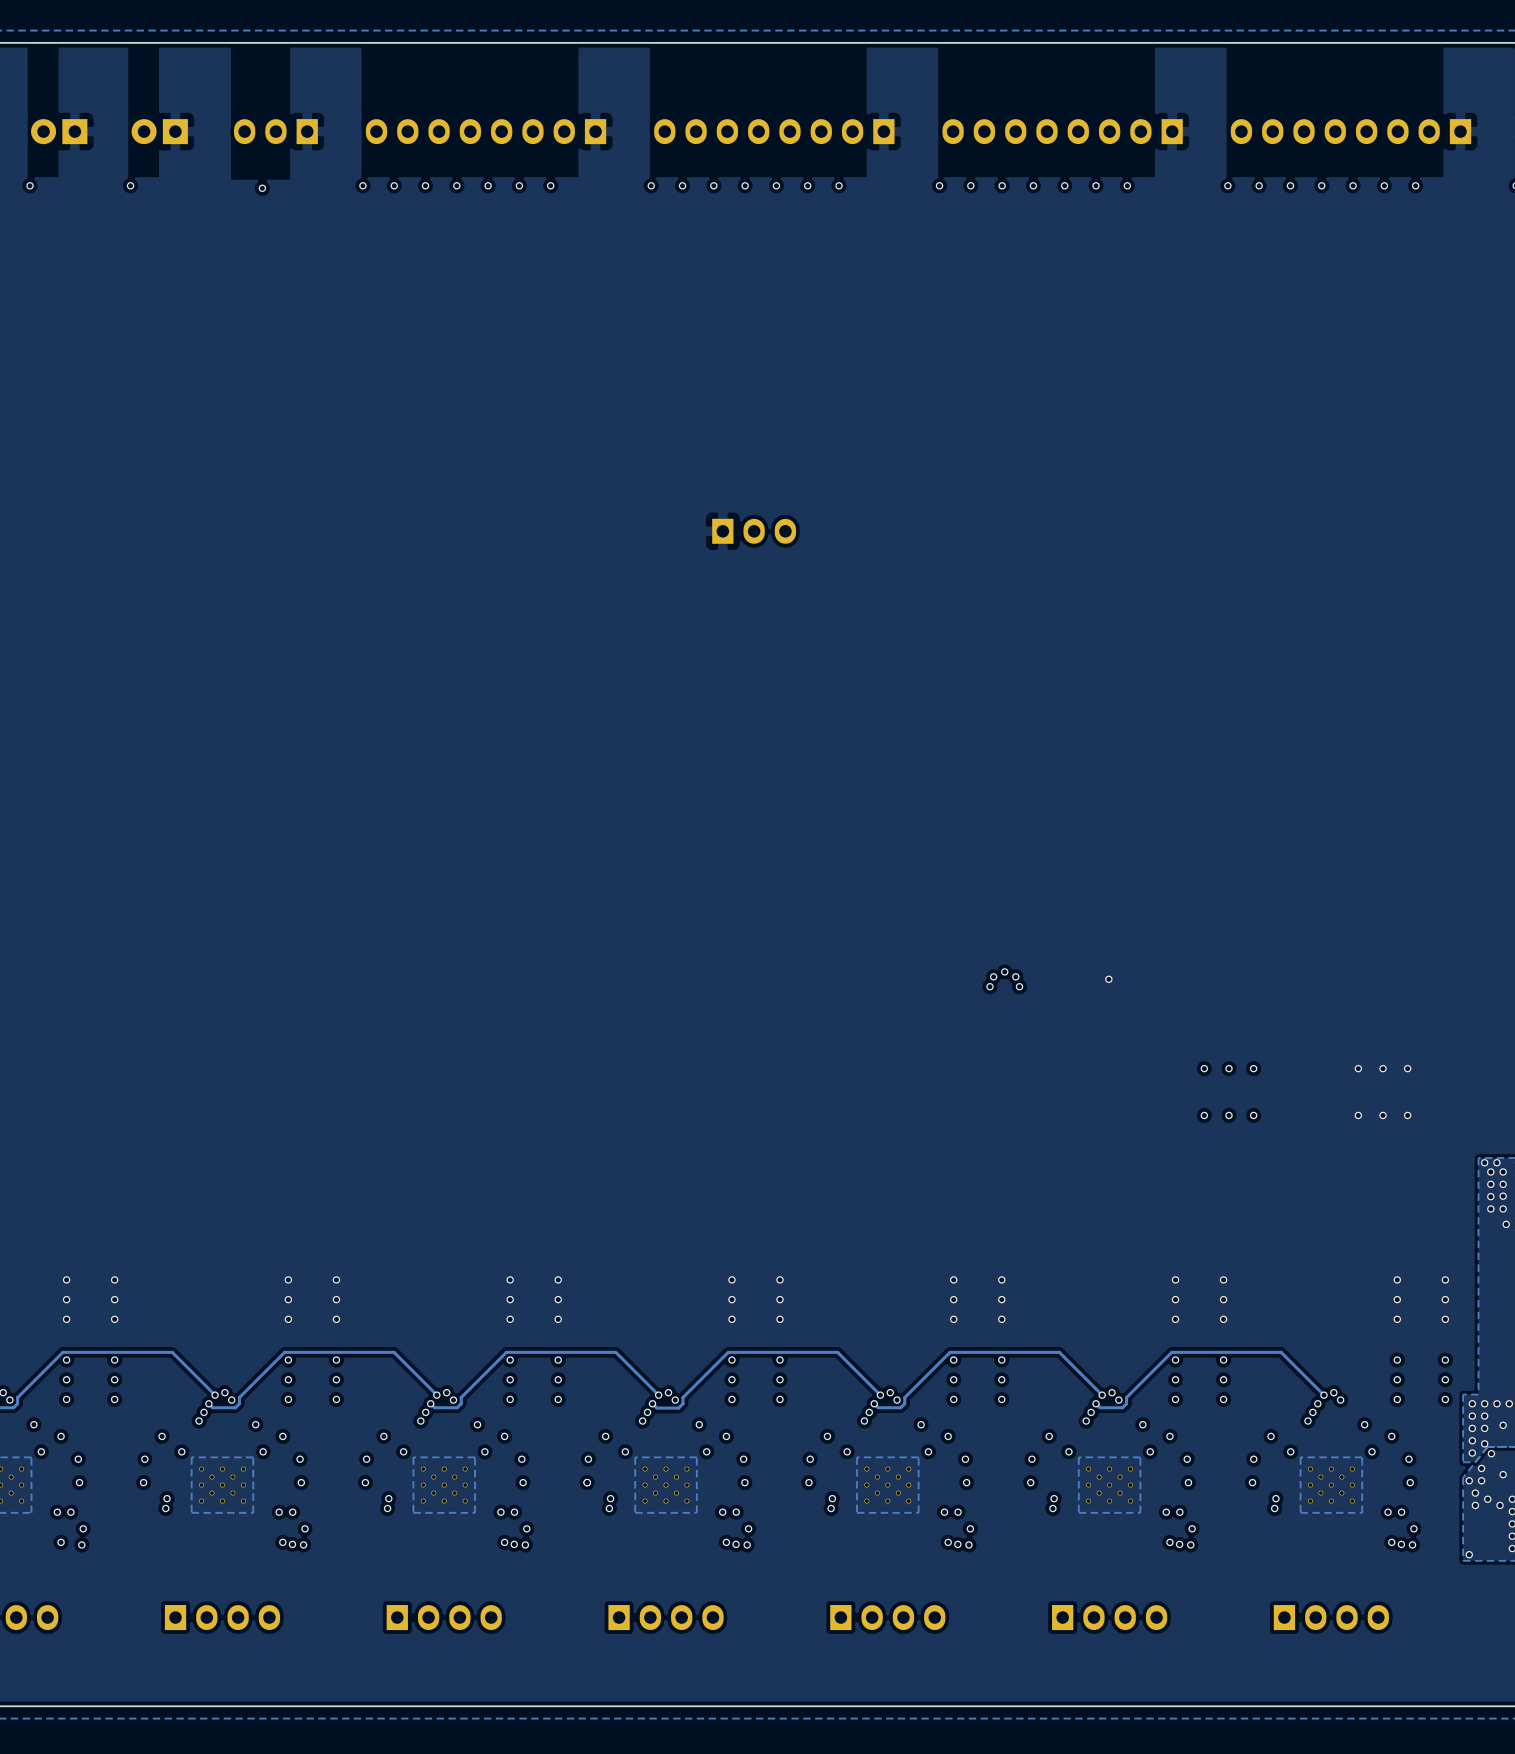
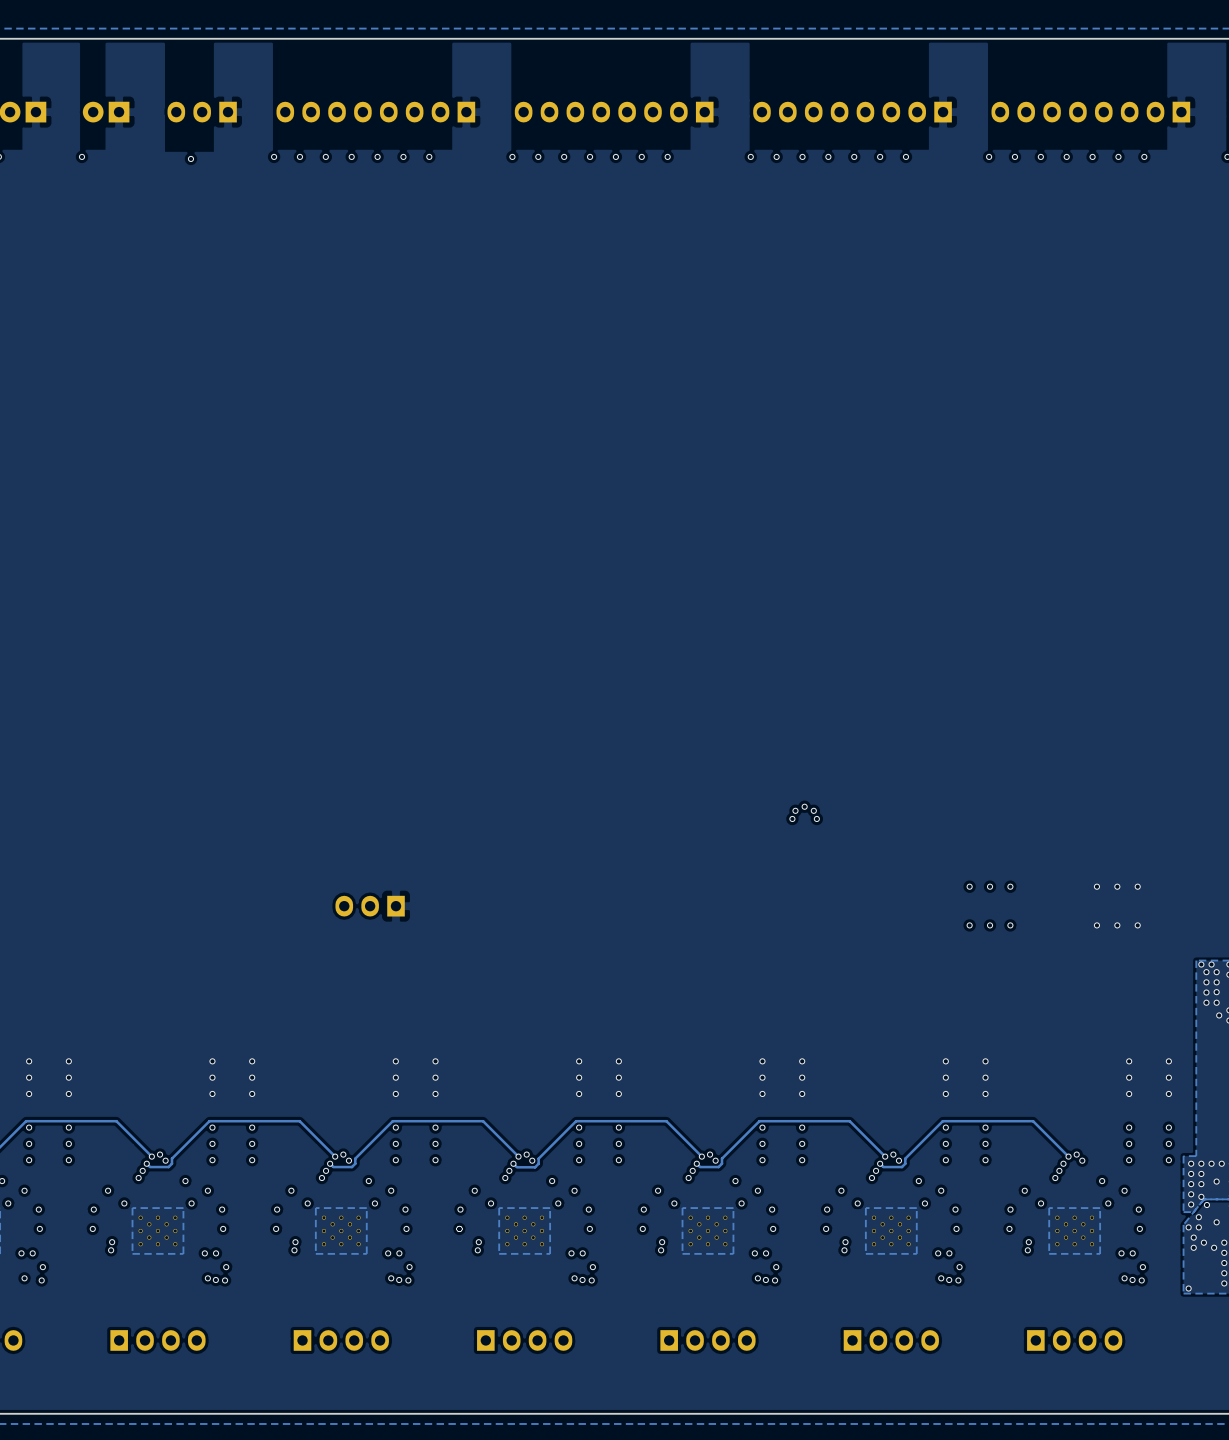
part: (754, 531) -> none
via: (1108, 979) -> none
part: none -> (370, 906)

